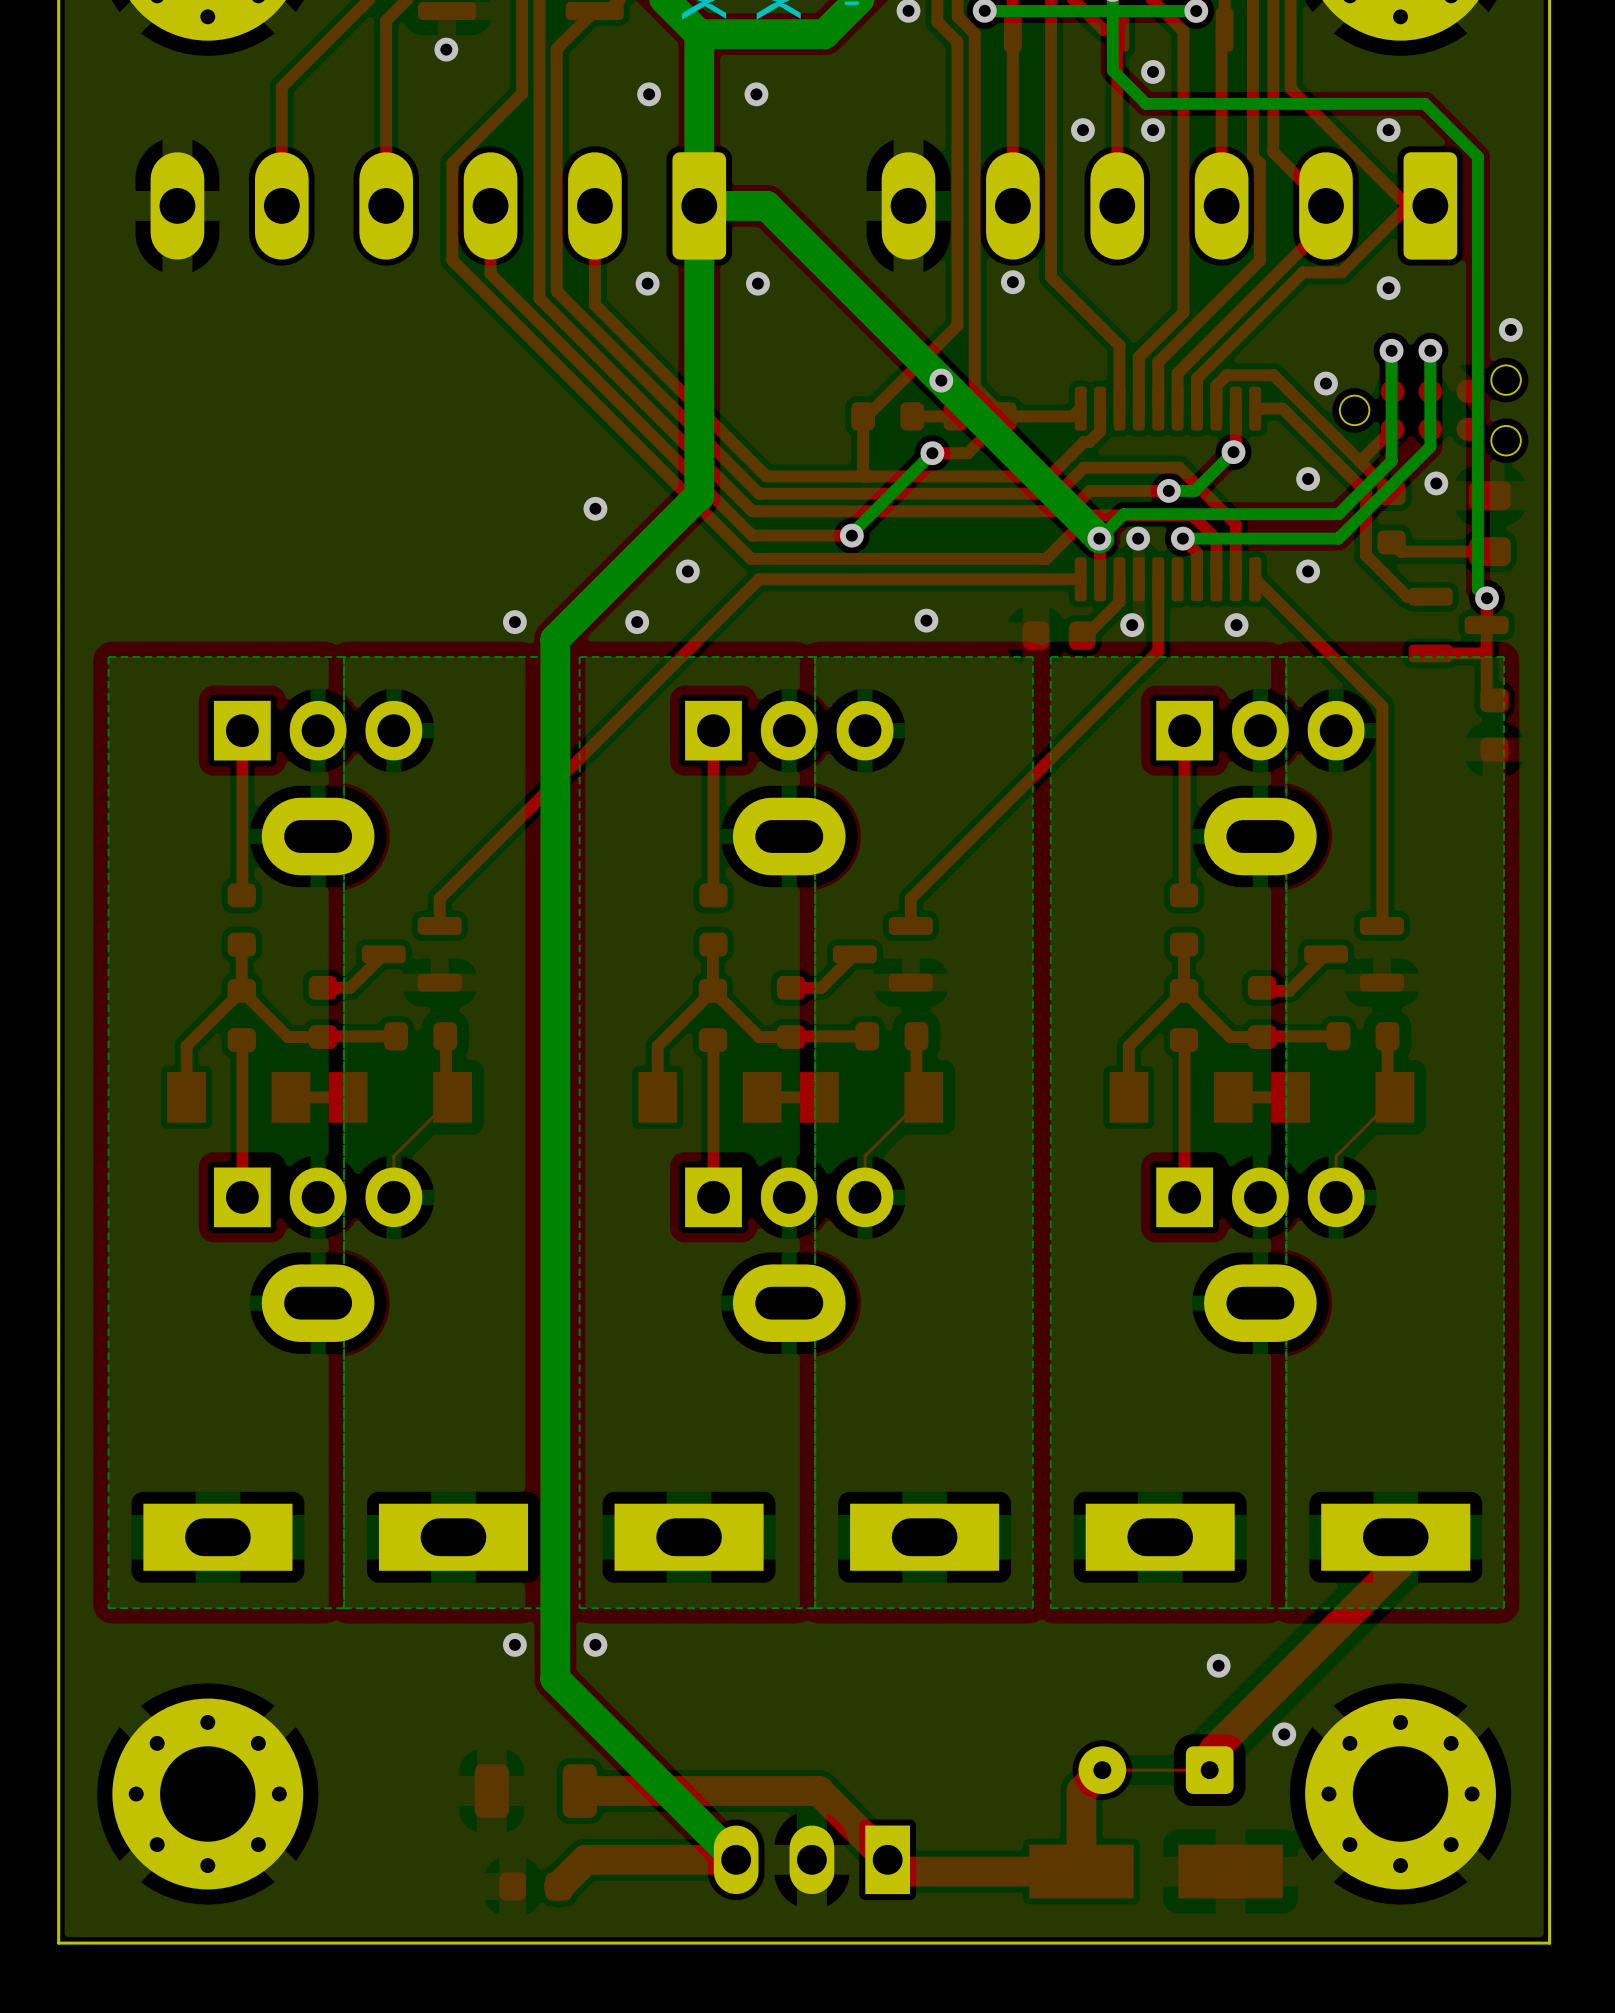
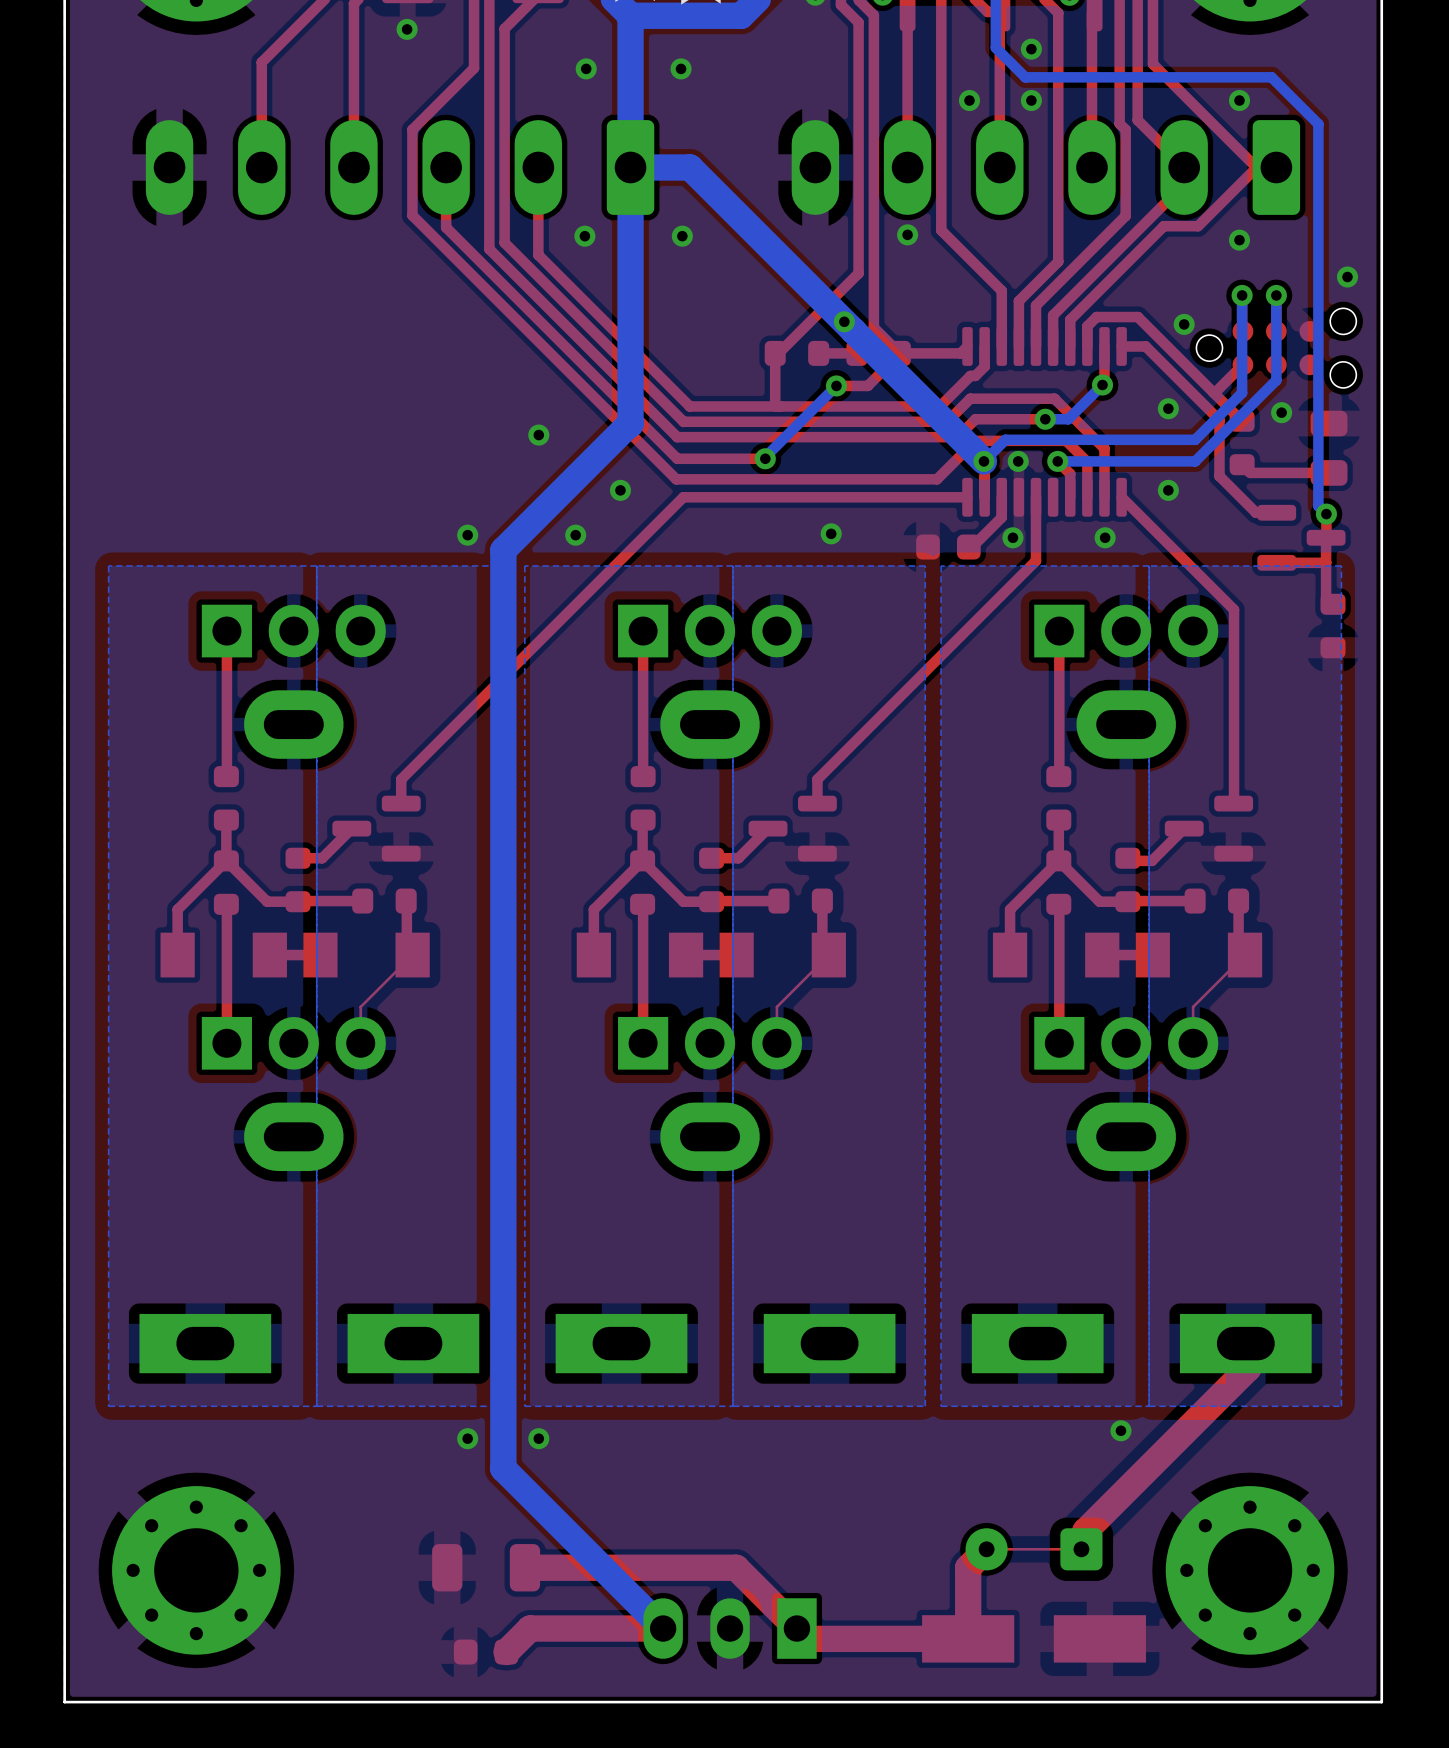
via position: (1218, 1665) -> (1120, 1430)
via: (1284, 1734) -> none

